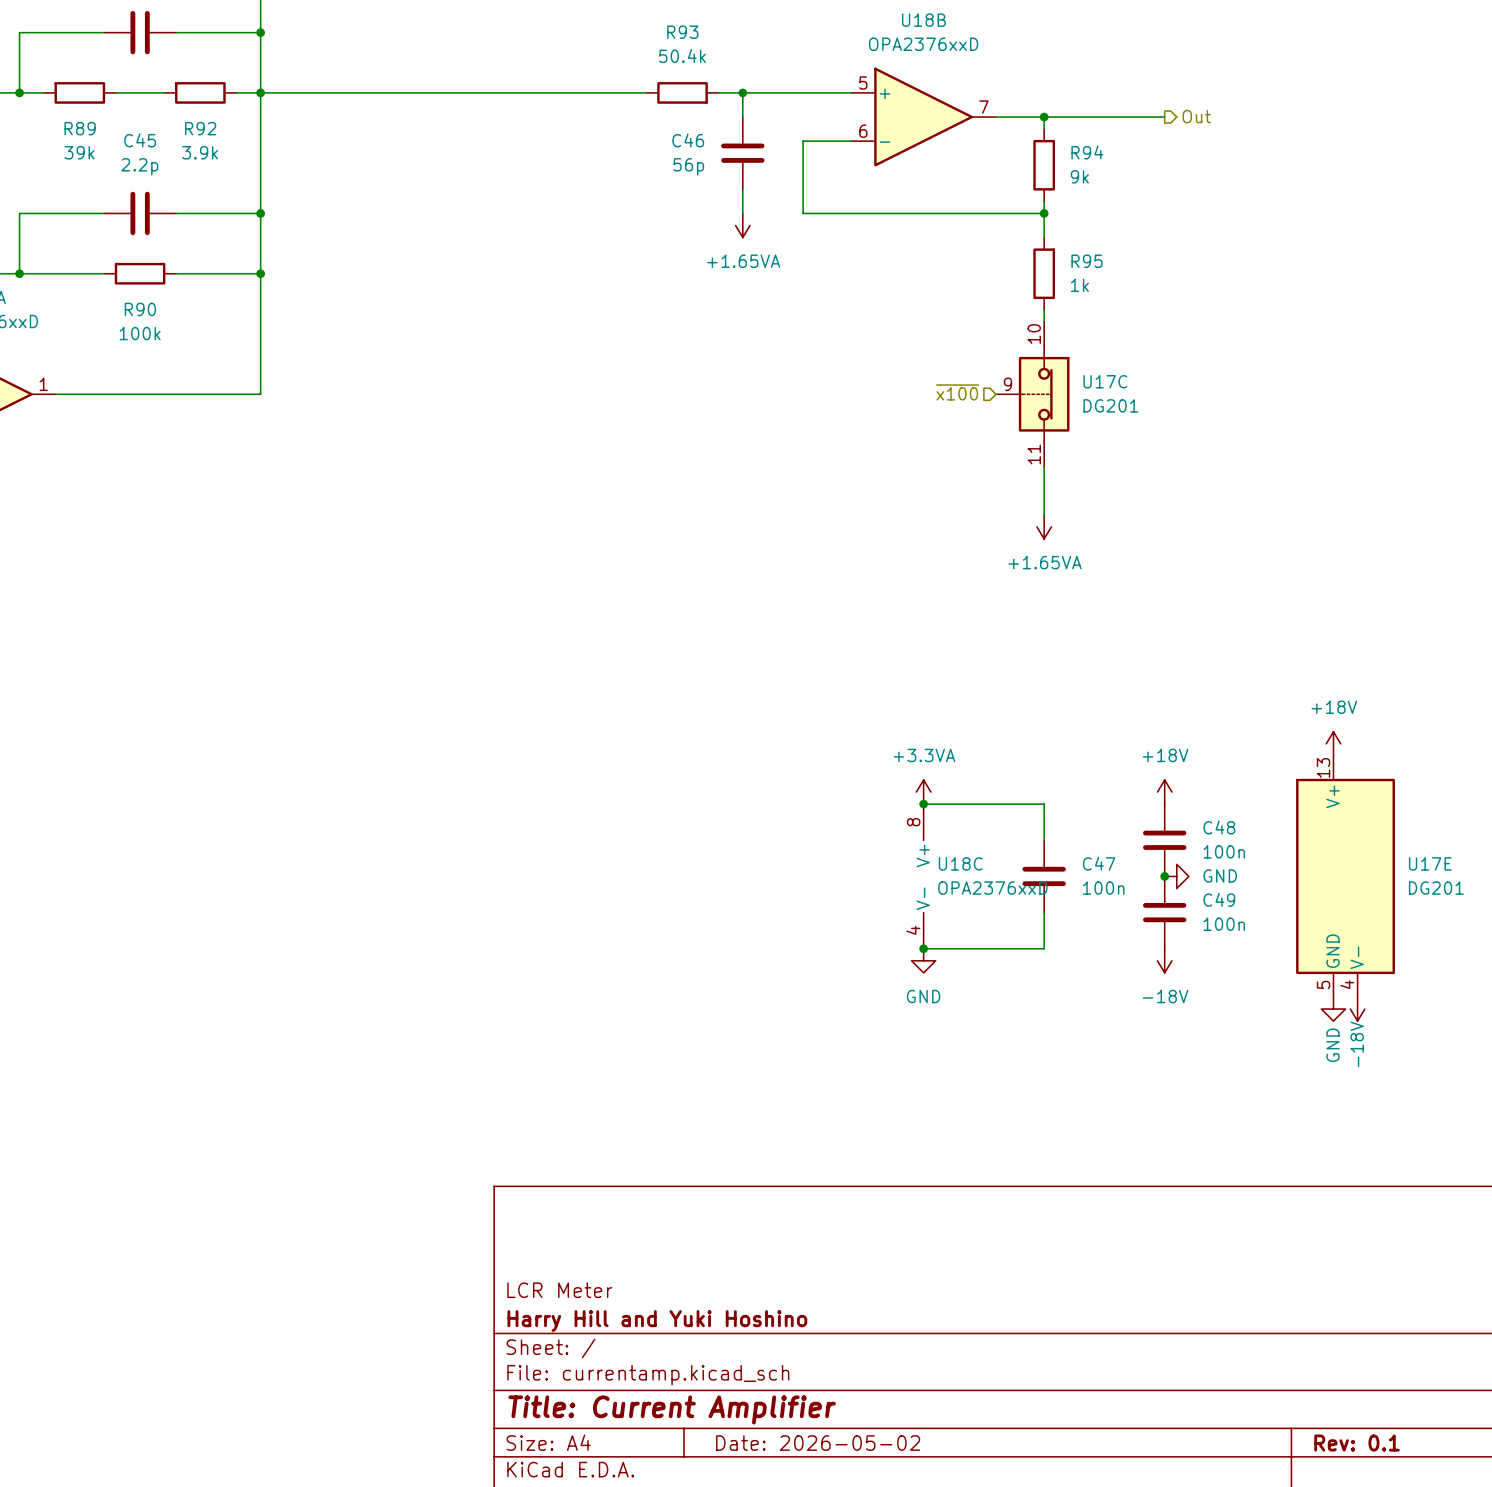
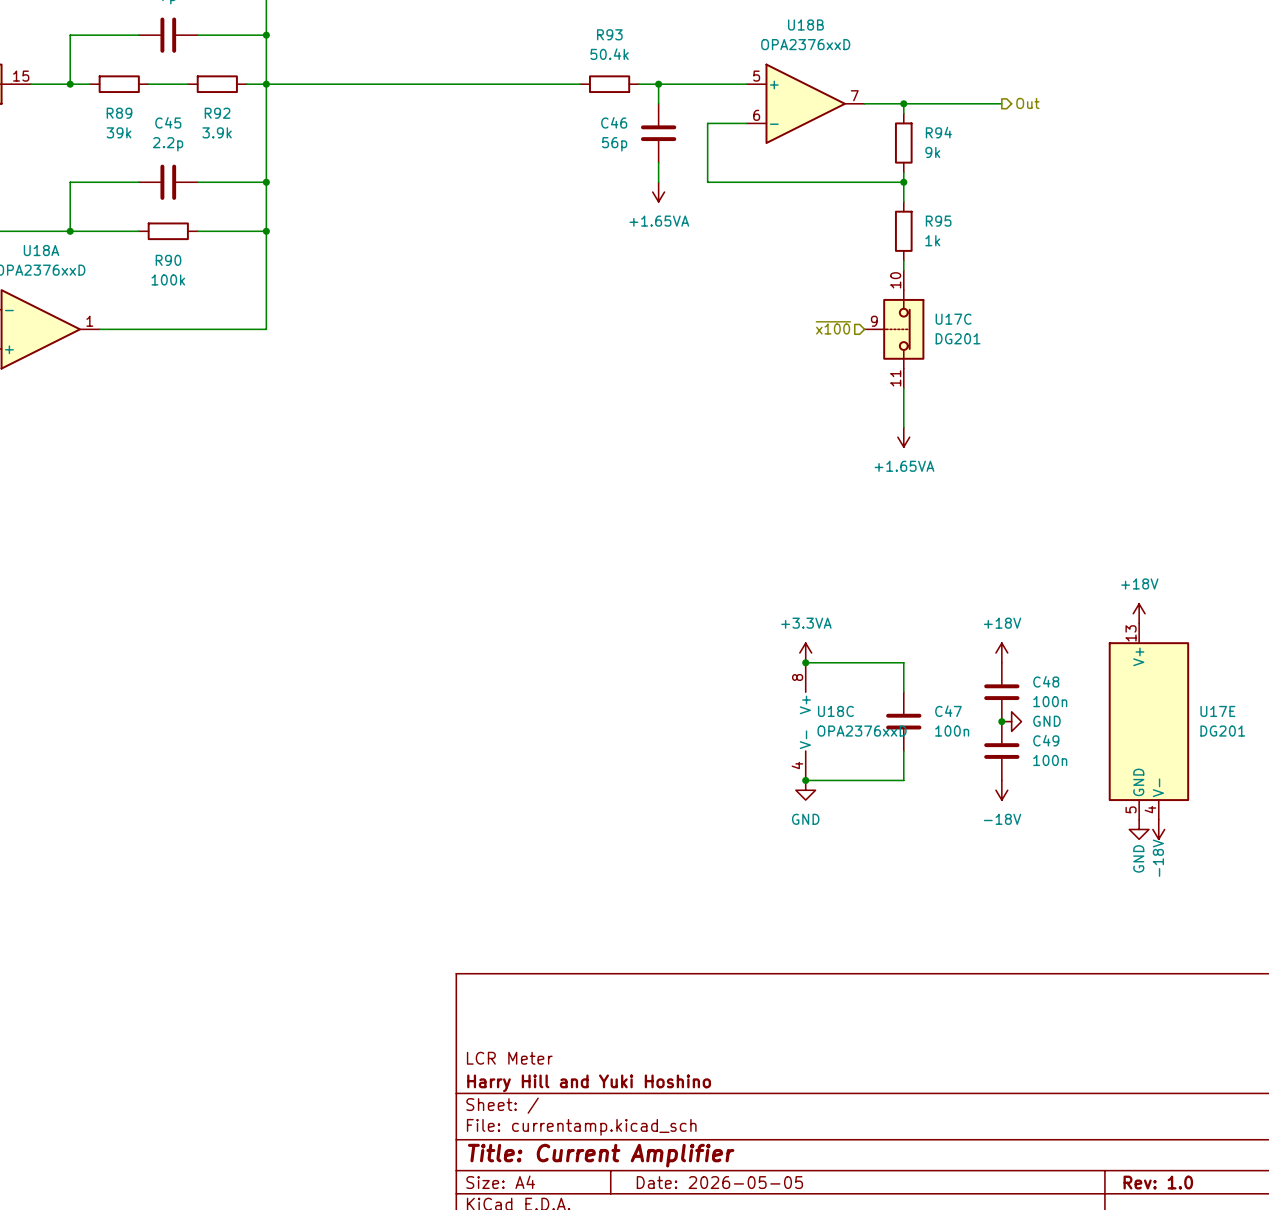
title block: Date: 2026-05-02 (818, 1443) -> Date: 2026-05-05 (719, 1182)
title block: Rev: 0.1 (1357, 1443) -> Rev: 1.0 (1158, 1182)

